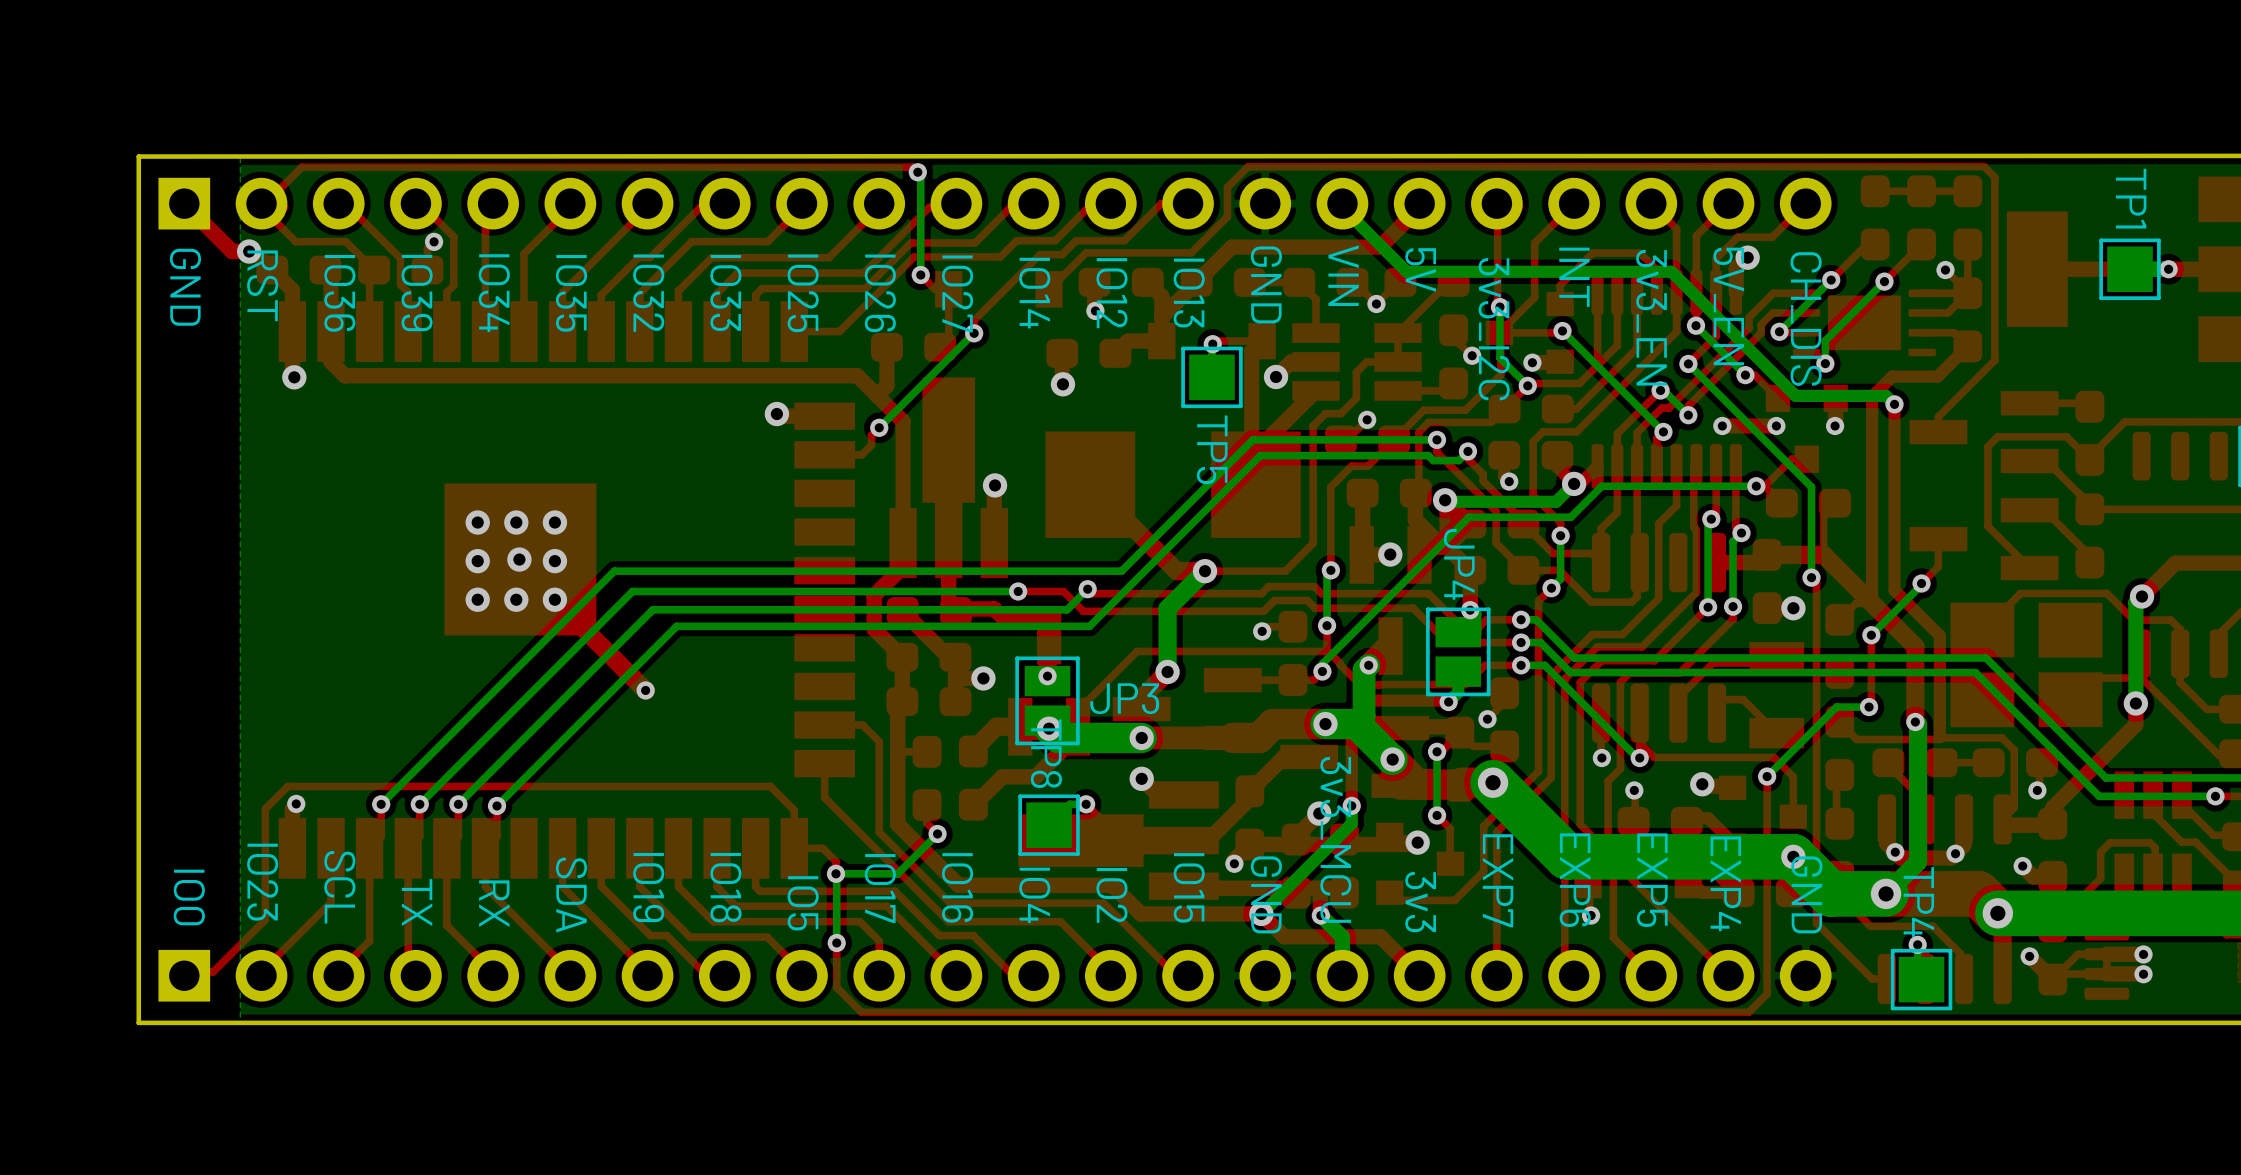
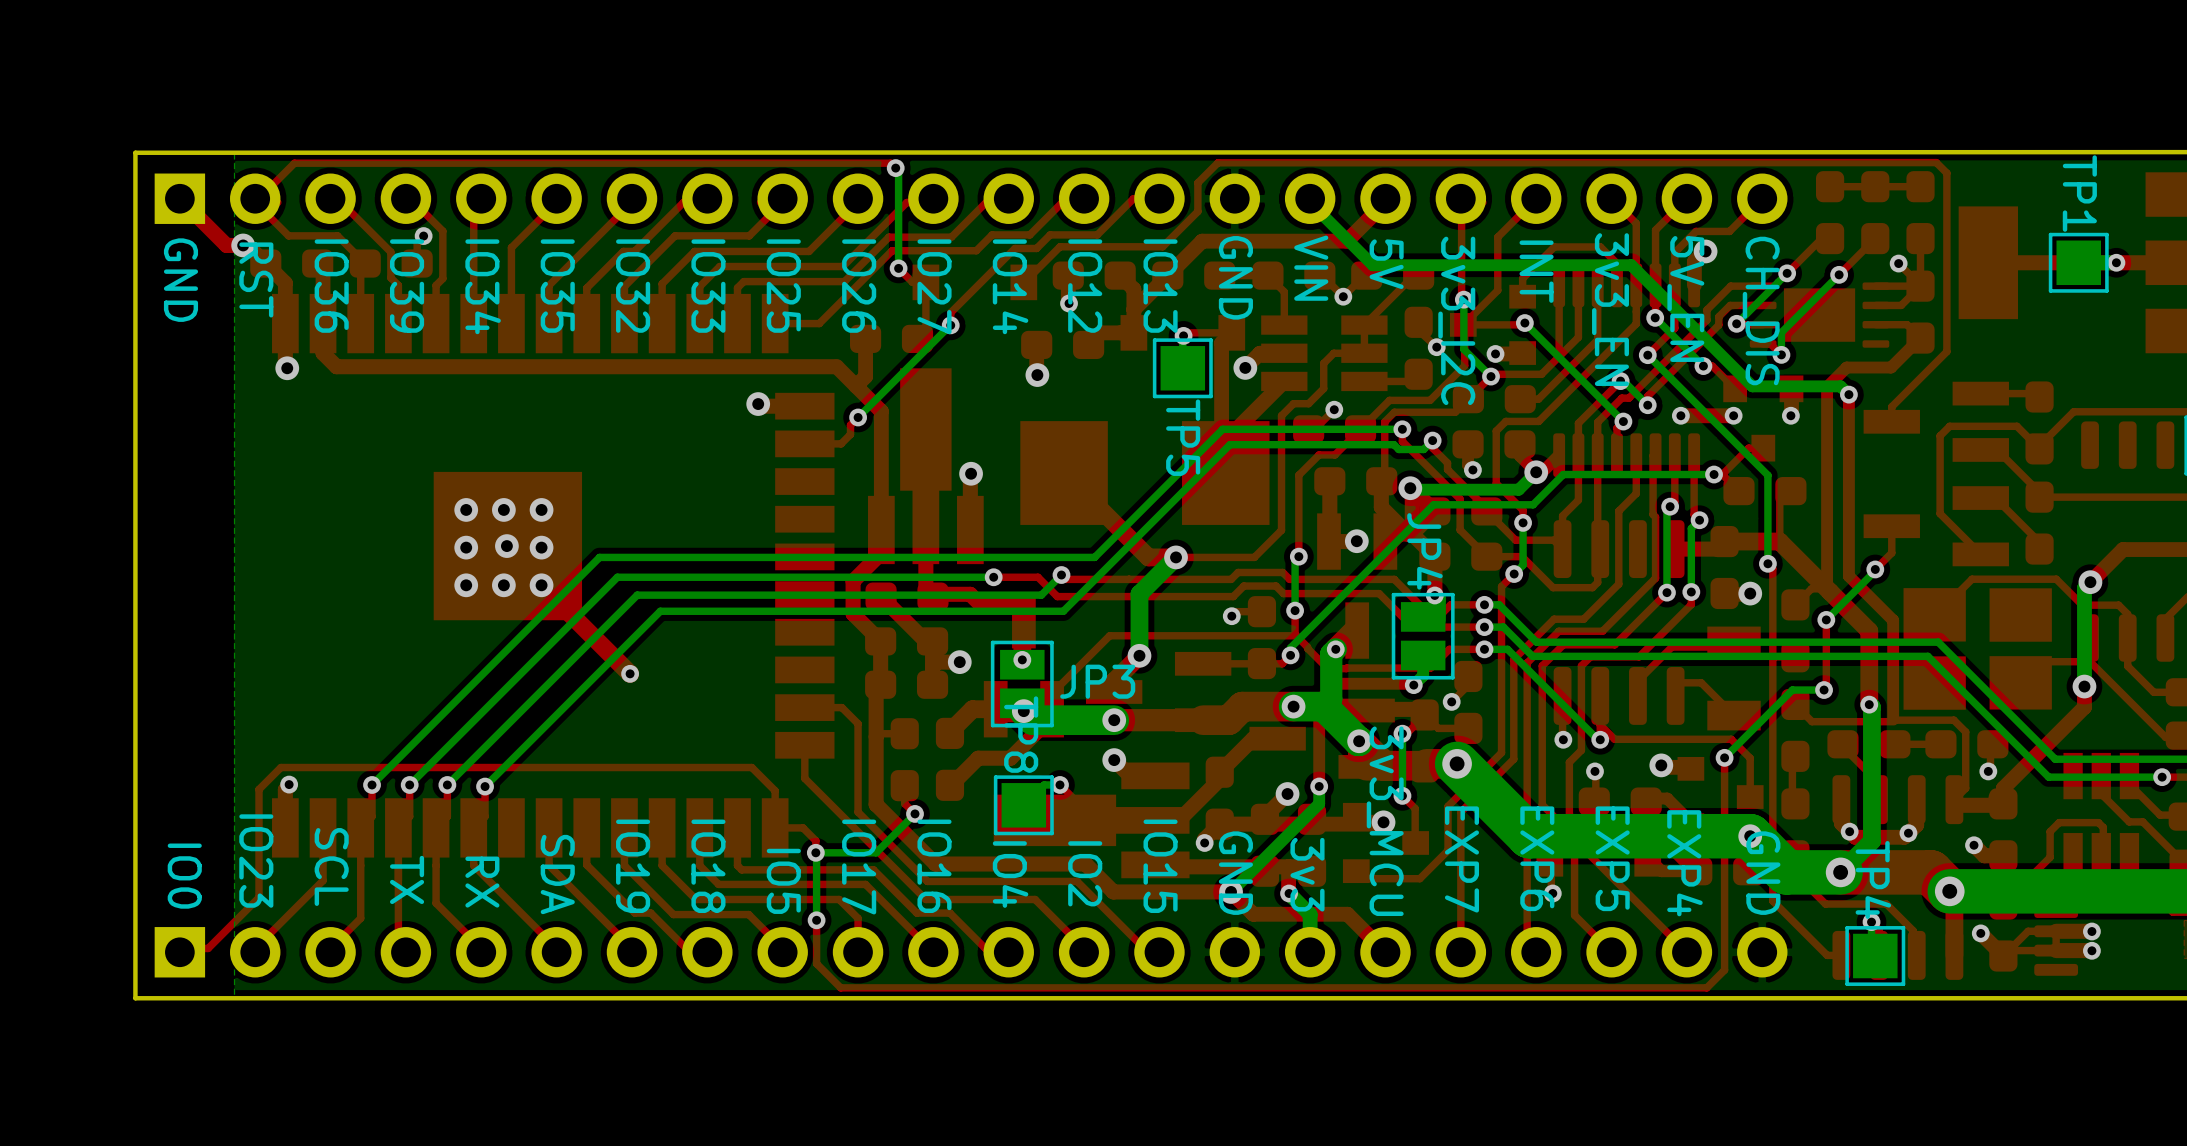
text position: 3v3_MCU (1335, 839) -> 3v3_MCU (1385, 821)
text position: 3v3 (1420, 902) -> 3v3 (1307, 874)

